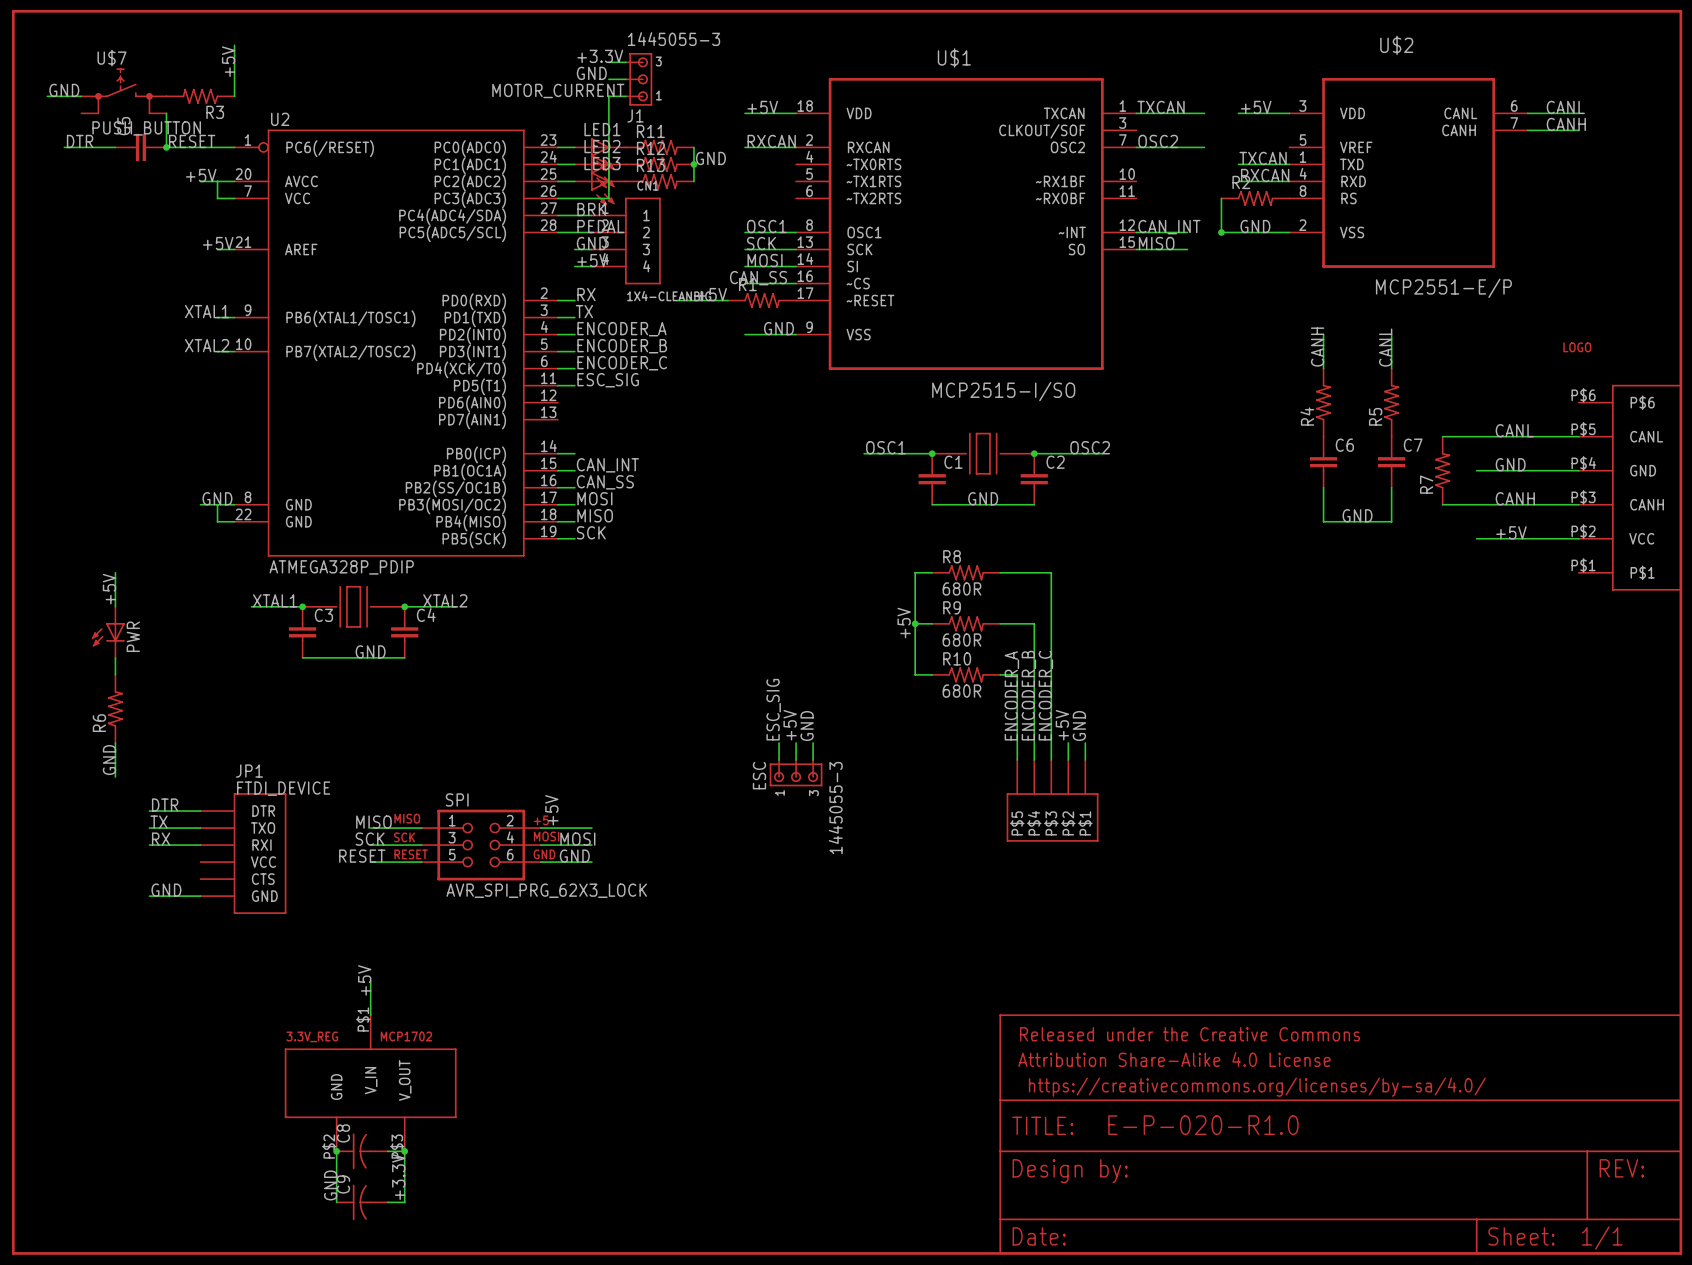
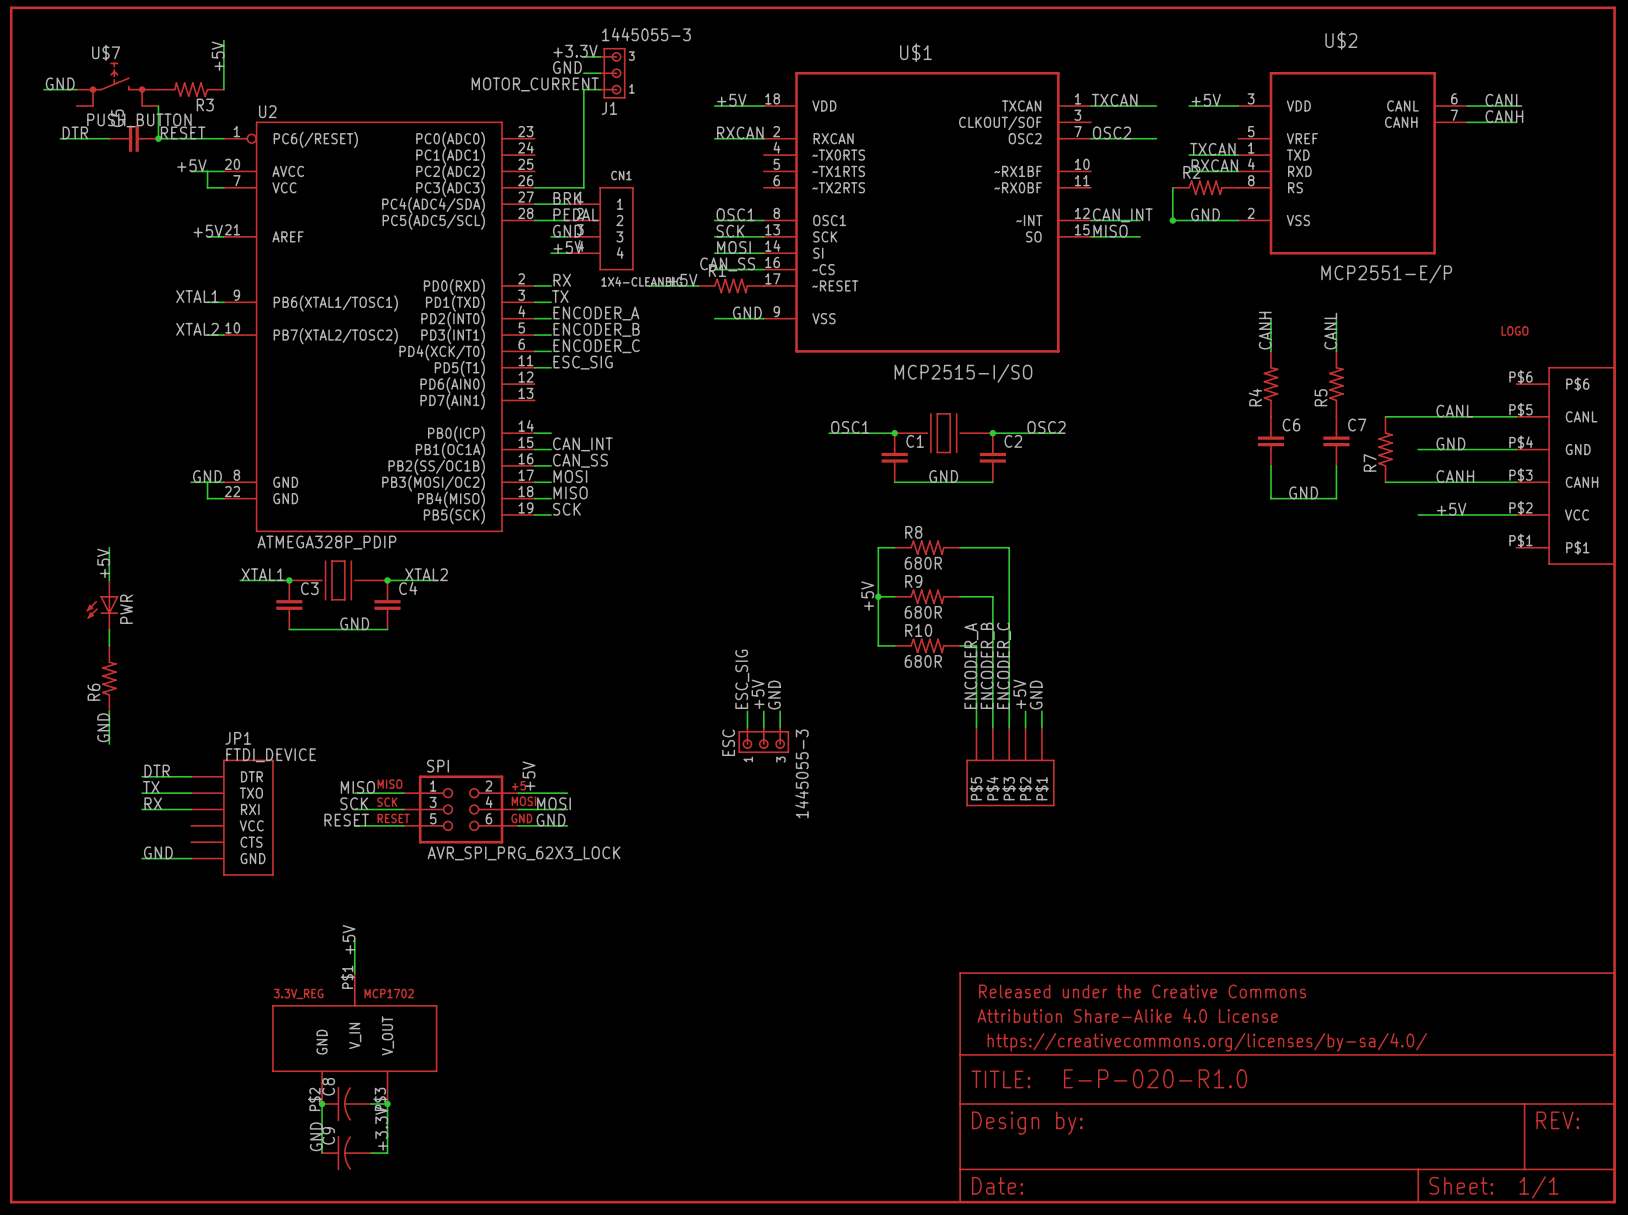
wire: (557, 147) (574, 147) -> none
R11: (659, 147) -> none
wire: (693, 147) (693, 181) -> none
LED1: (600, 154) -> none
label: GND (710, 158) -> none
wire: (557, 164) (574, 164) -> none
R12: (659, 164) -> none
junction: (693, 164) -> none
LED2: (600, 171) -> none
wire: (557, 181) (574, 181) -> none
R13: (659, 181) -> none
LED3: (600, 188) -> none

